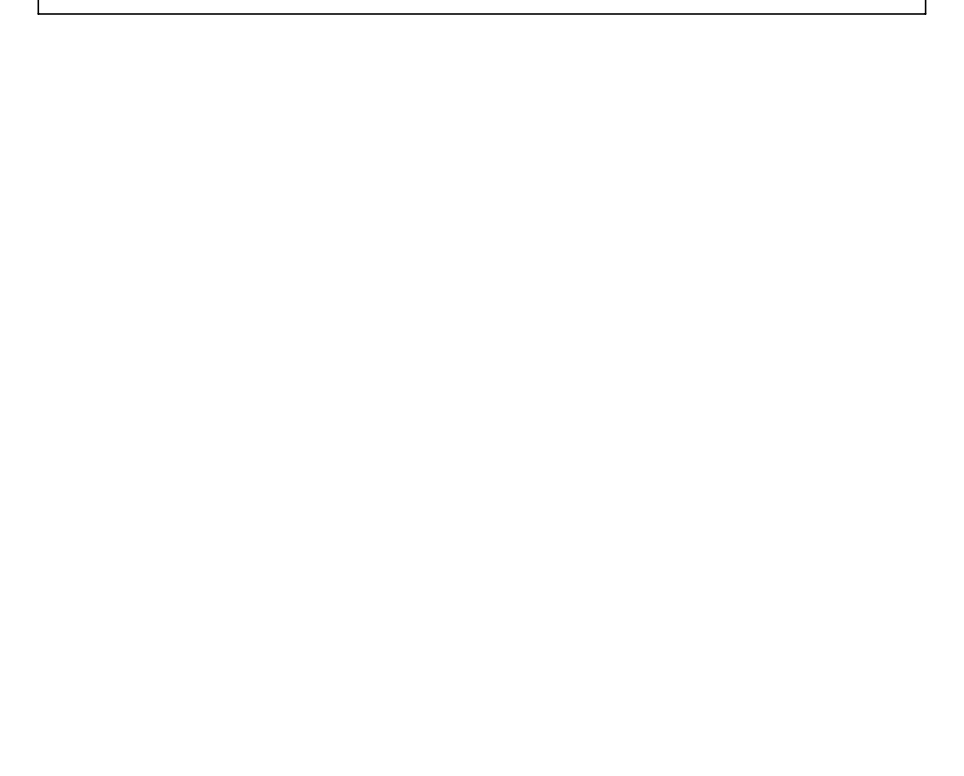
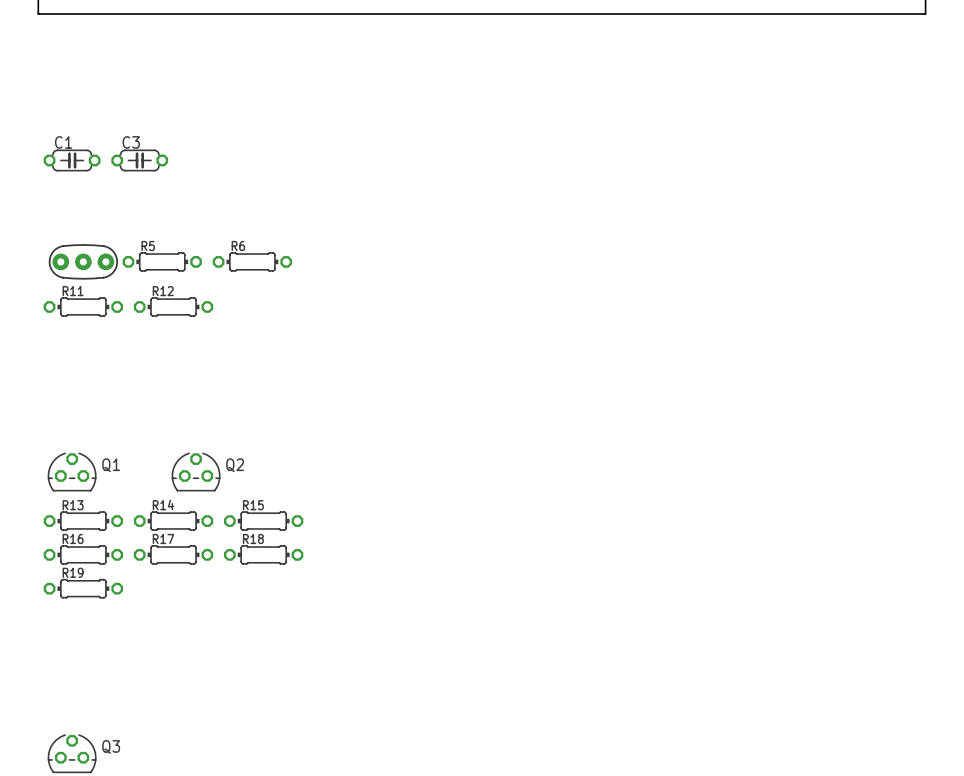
C1: none -> (72, 160)
C3: none -> (139, 160)
part: none -> (83, 261)
R5: none -> (162, 261)
R6: none -> (252, 261)
R11: none -> (83, 306)
R12: none -> (173, 306)
Q1: none -> (72, 472)
Q2: none -> (196, 472)
R13: none -> (83, 521)
R14: none -> (173, 521)
R15: none -> (263, 521)
R16: none -> (83, 554)
R17: none -> (173, 554)
R18: none -> (263, 554)
R19: none -> (83, 588)
Q3: none -> (72, 753)

